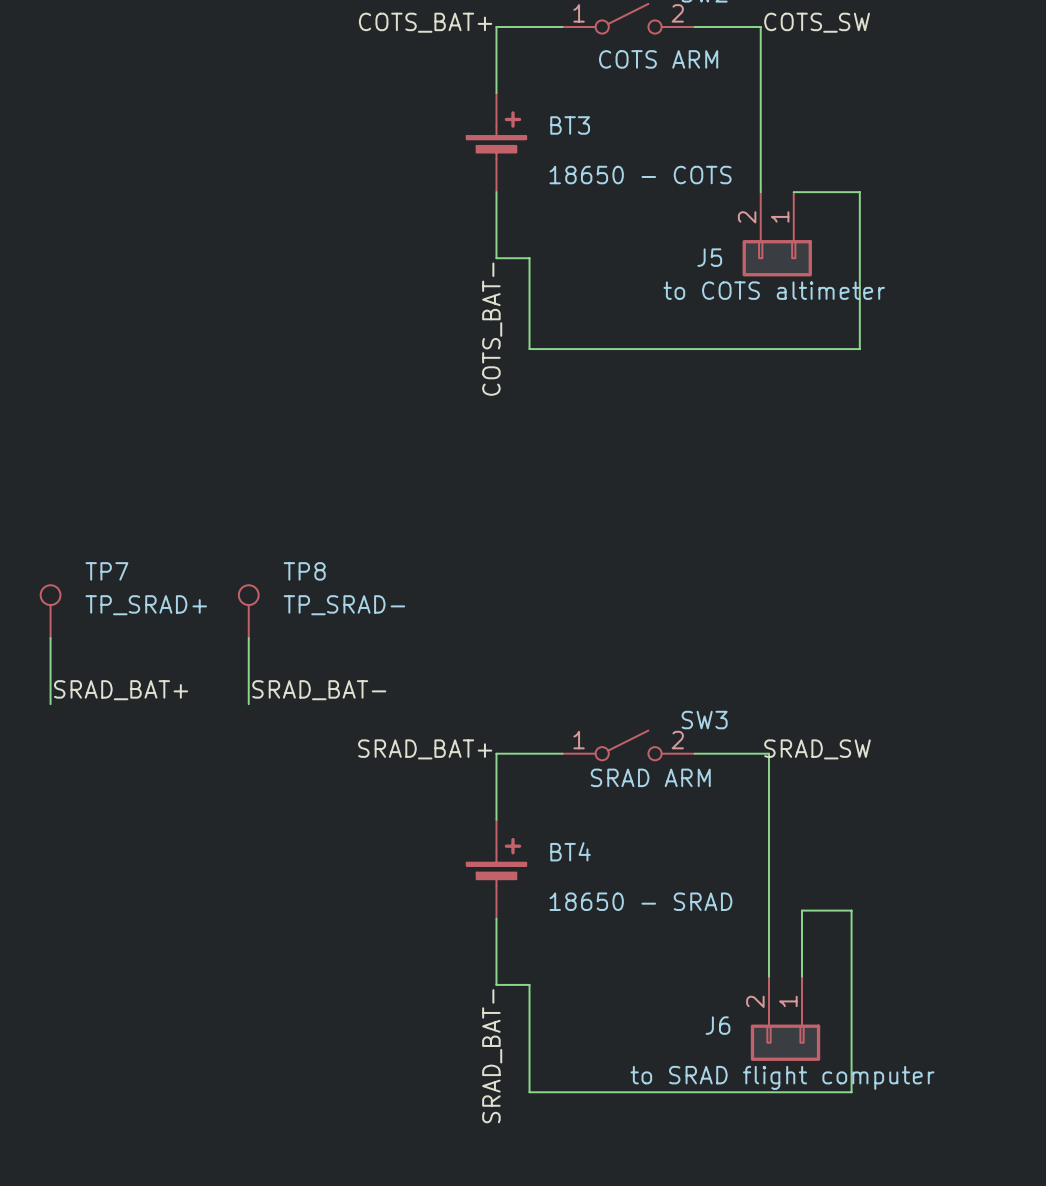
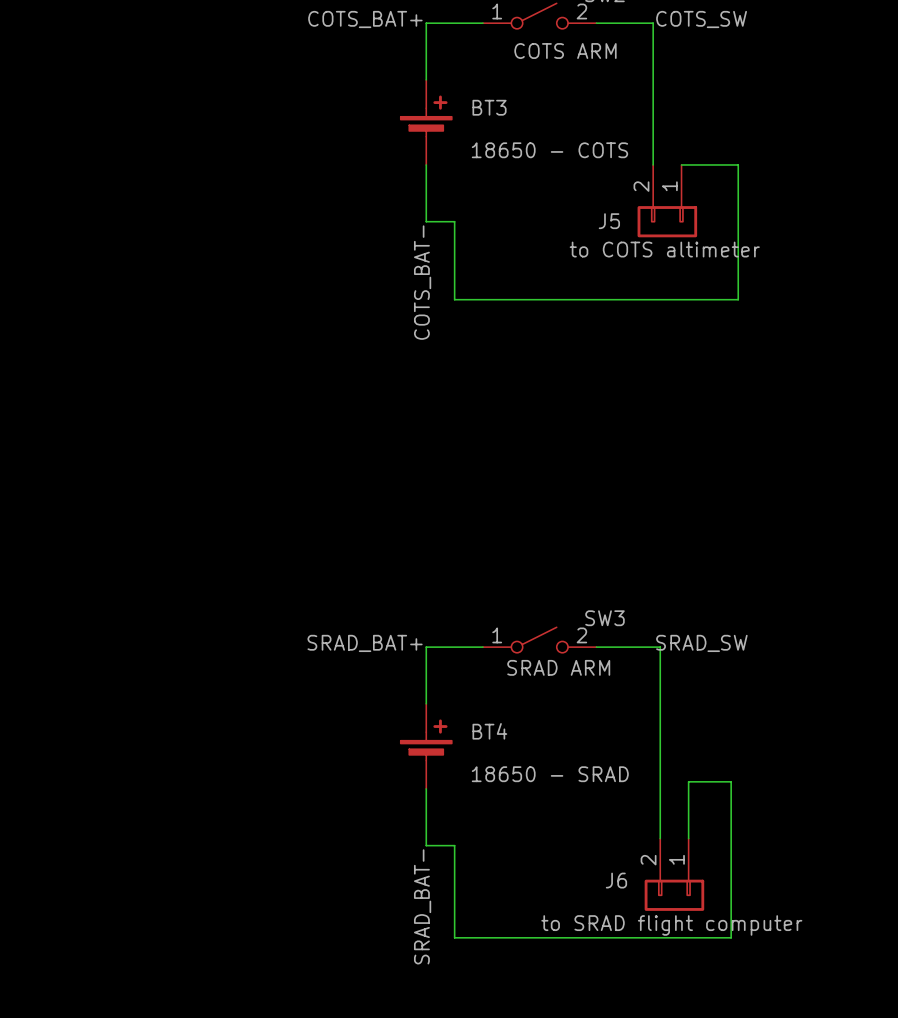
TP7: TP_SRAD+ (50, 611) -> none
TP8: TP_SRAD- (248, 611) -> none
wire: (50, 638) (50, 704) -> none
wire: (248, 638) (248, 704) -> none
label: SRAD_BAT+ (121, 690) -> none
label: SRAD_BAT- (319, 690) -> none

